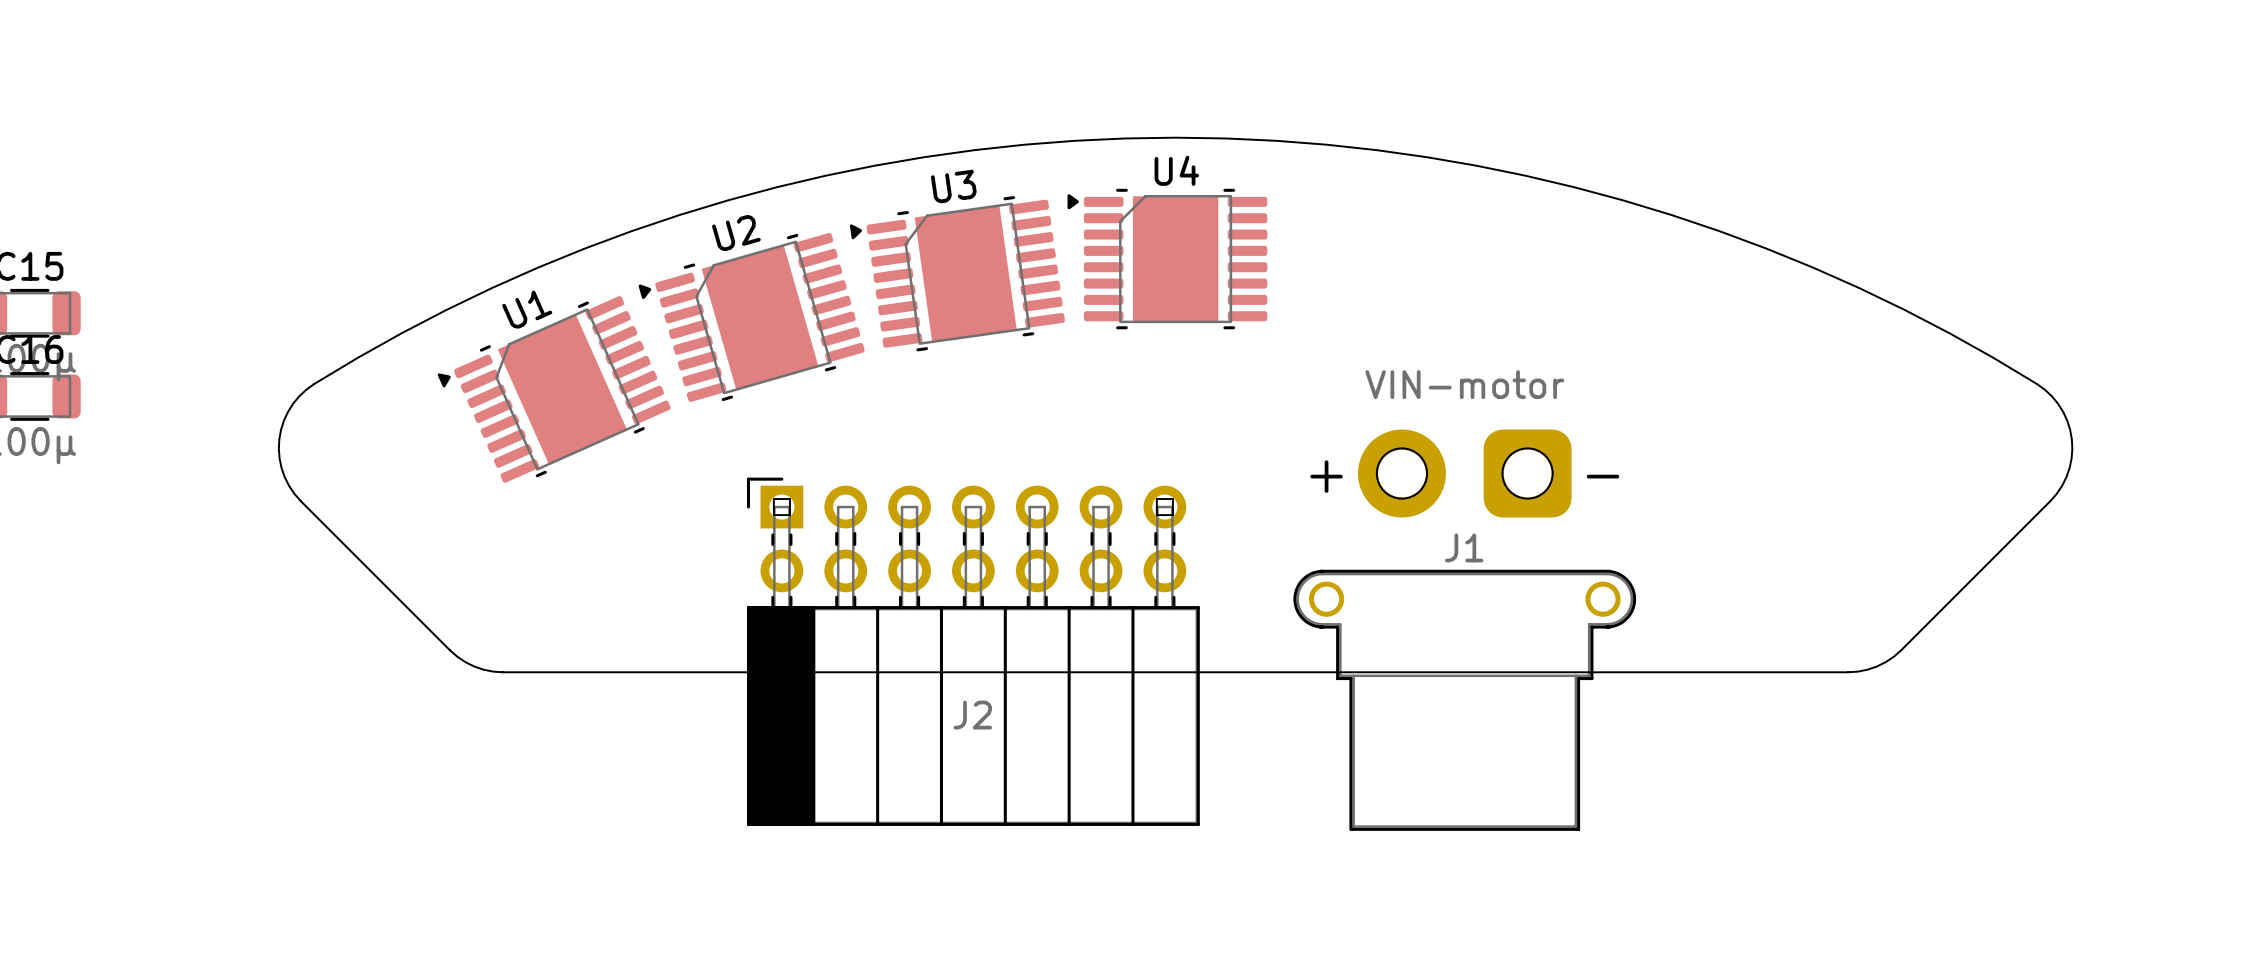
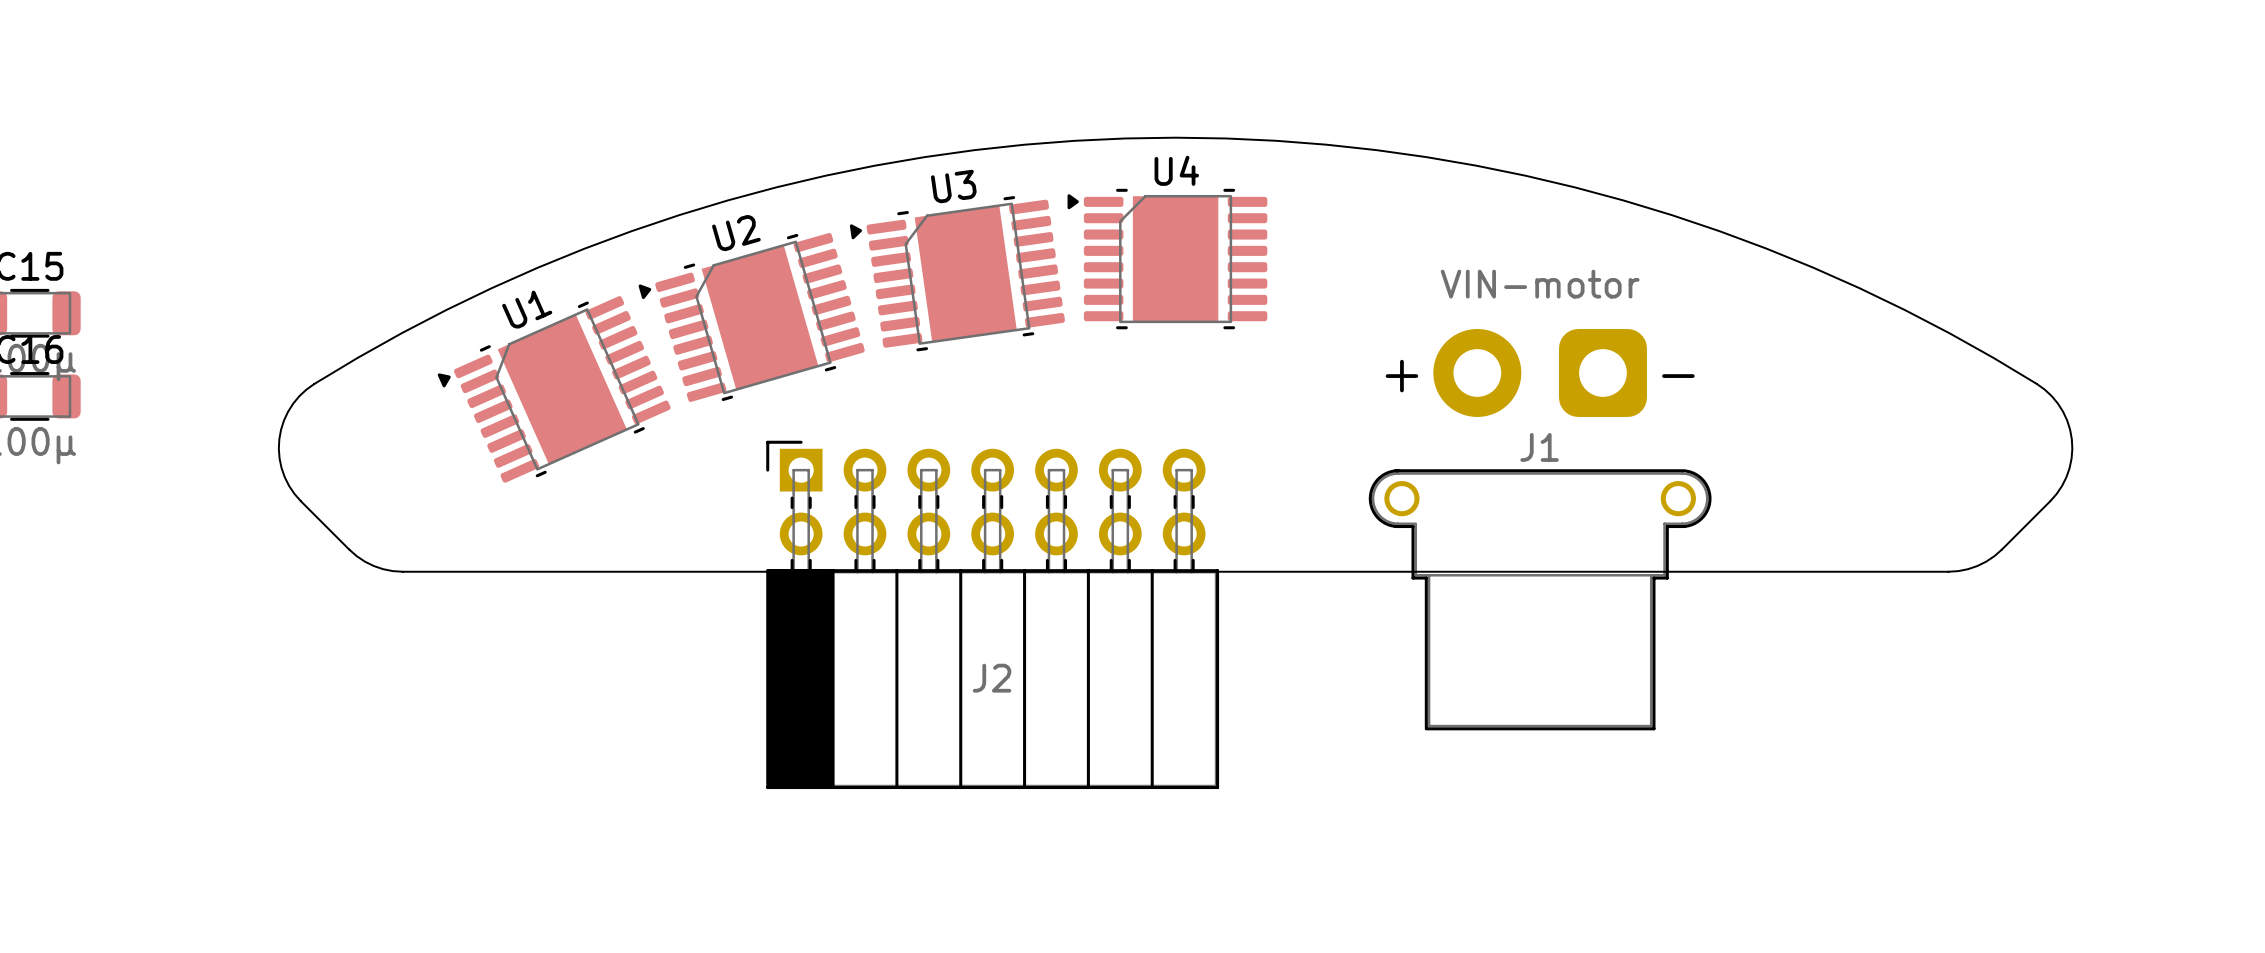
round board edge: [1376, 448, 1428, 499] -> none
round board edge: [1502, 448, 1553, 499] -> none
board edge: (773, 499) (773, 515) (789, 515) (789, 499) (773, 499) -> none
board edge: (1156, 499) (1172, 499) (1172, 515) (1156, 515) (1156, 499) -> none
board edge: (349, 549) (457, 656) (474, 666) (503, 672) (1857, 671) (1876, 666) (1893, 656) (2001, 549) -> (349, 549) (373, 566) (402, 571) (1948, 571) (1977, 566) (2001, 549)
J1 position: (1464, 630) -> (1540, 529)
J2 position: (973, 651) -> (992, 614)

